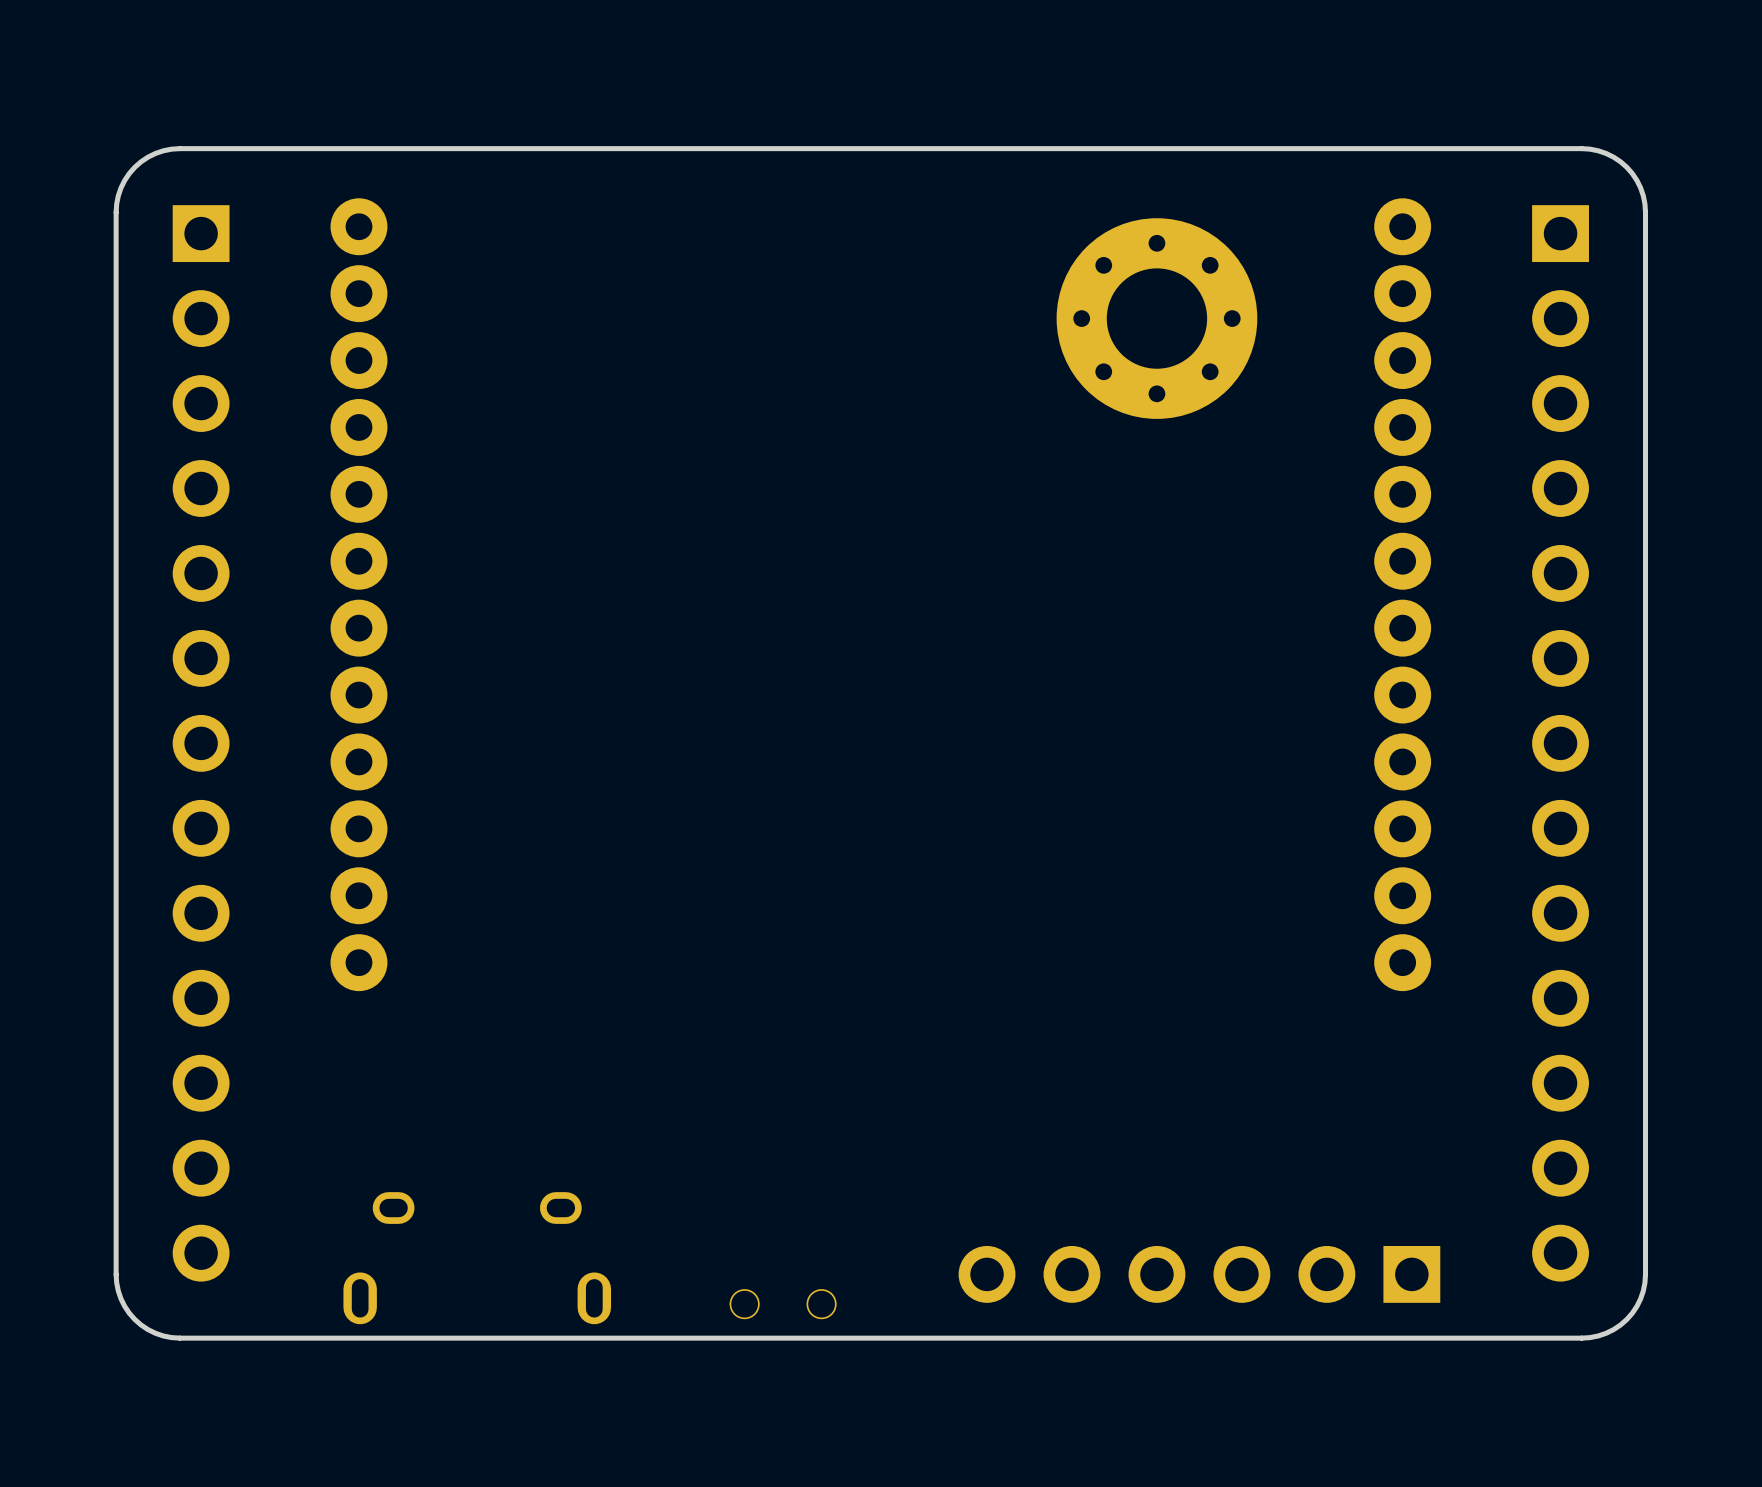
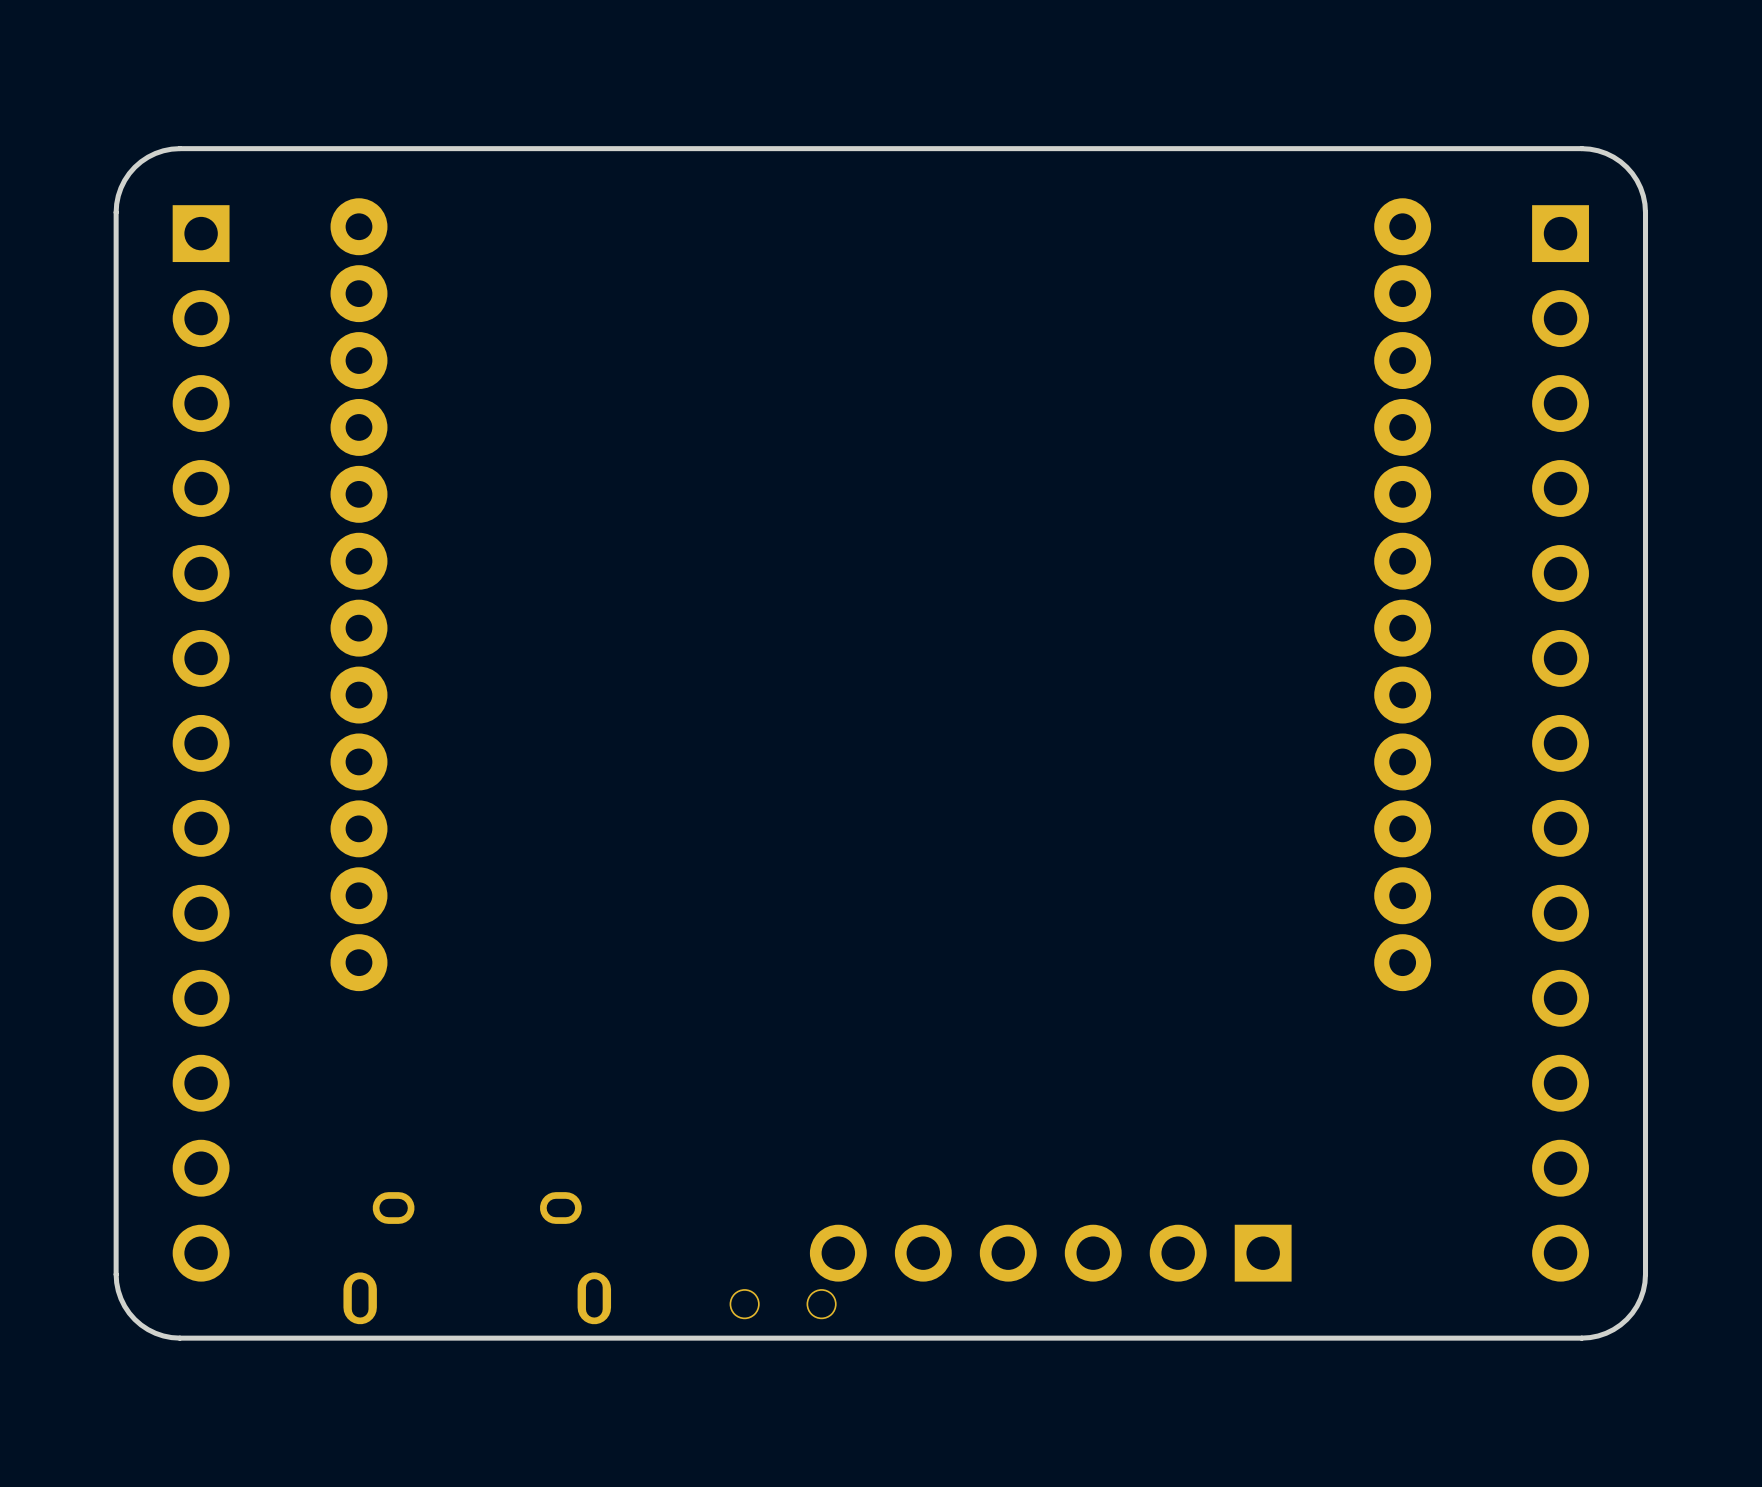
part: (1156, 318) -> none
part position: (1199, 1274) -> (1050, 1253)

